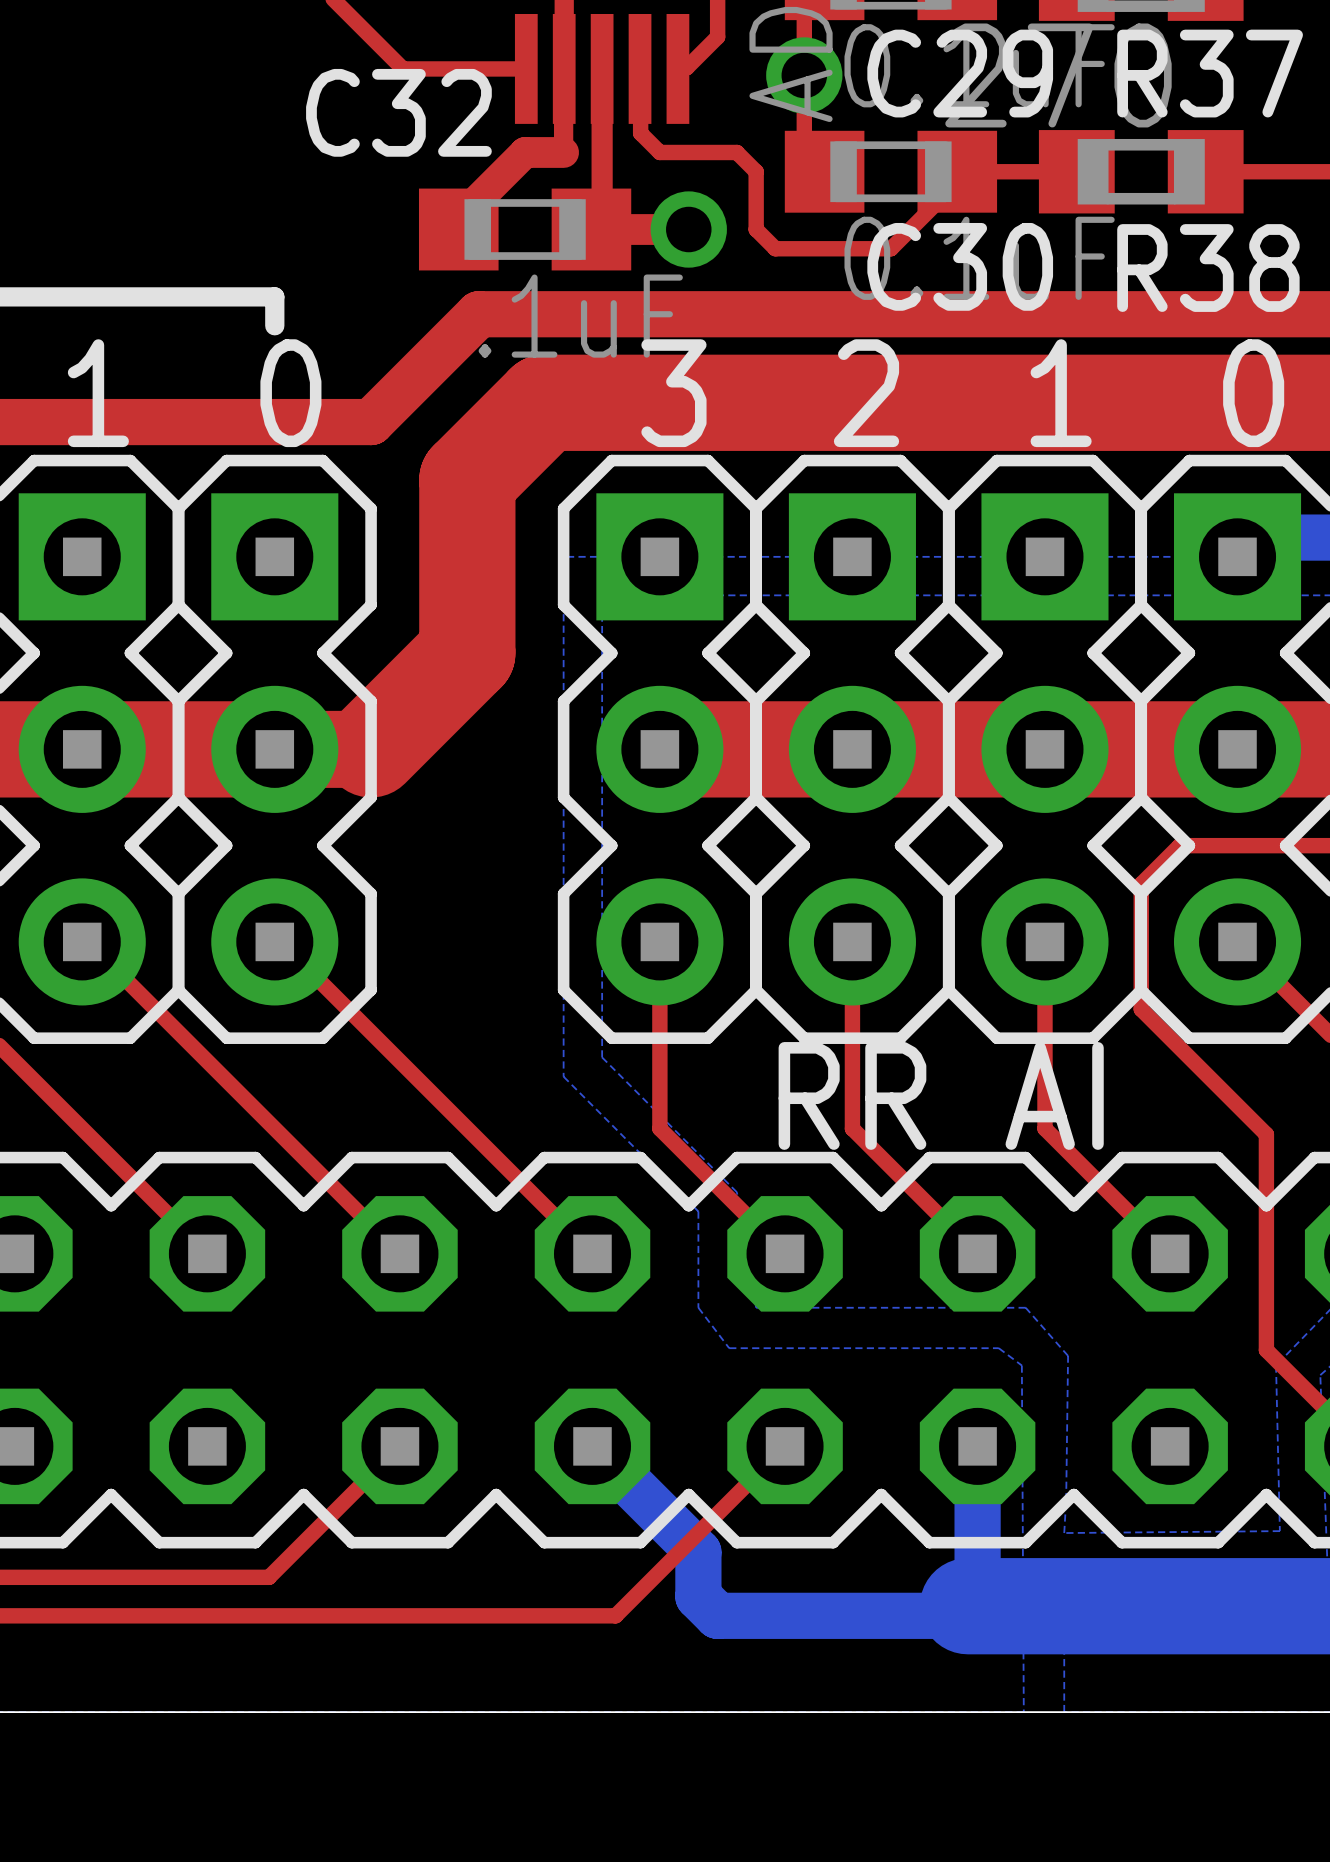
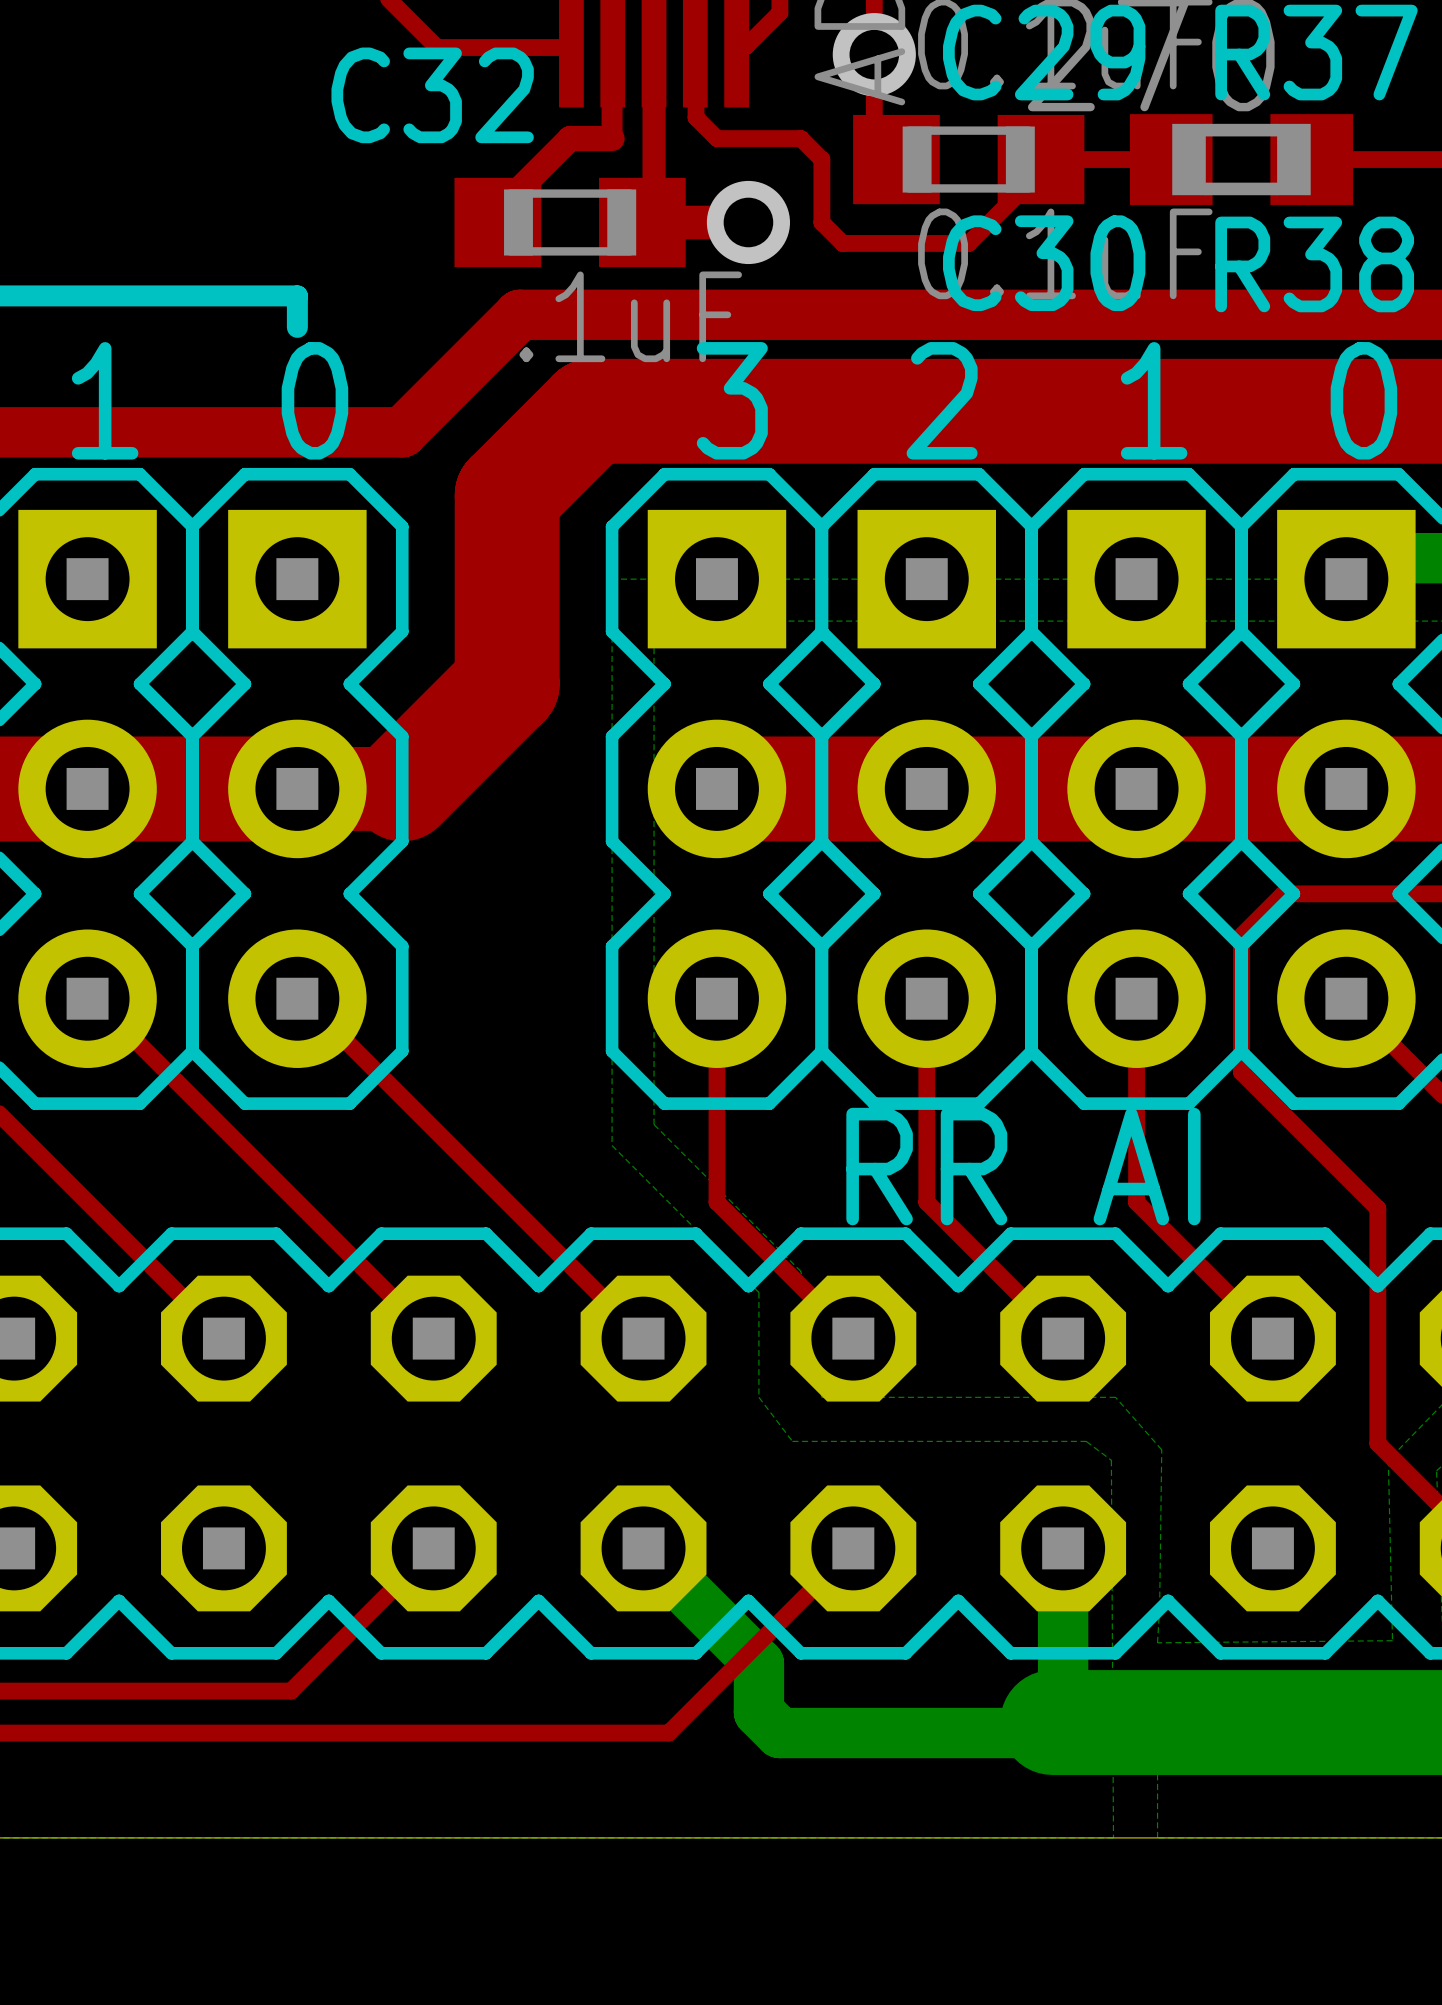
top track width: thick (563, 152) (525, 152) (458, 218) -> thin (612, 138) (570, 138) (497, 210)

